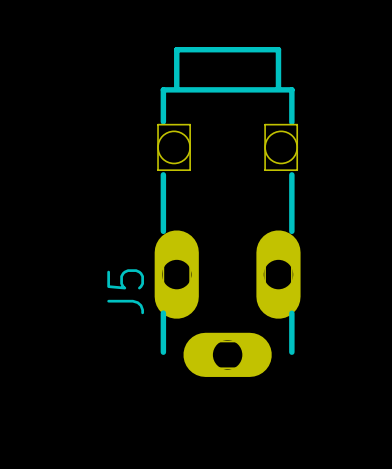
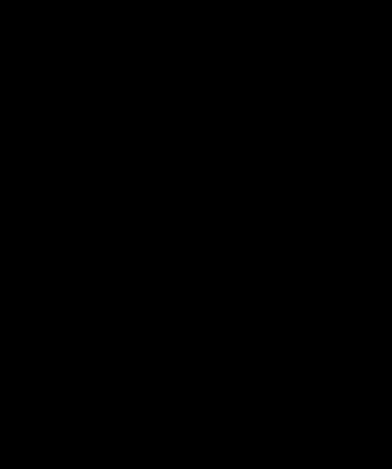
J5: (227, 211) -> none

